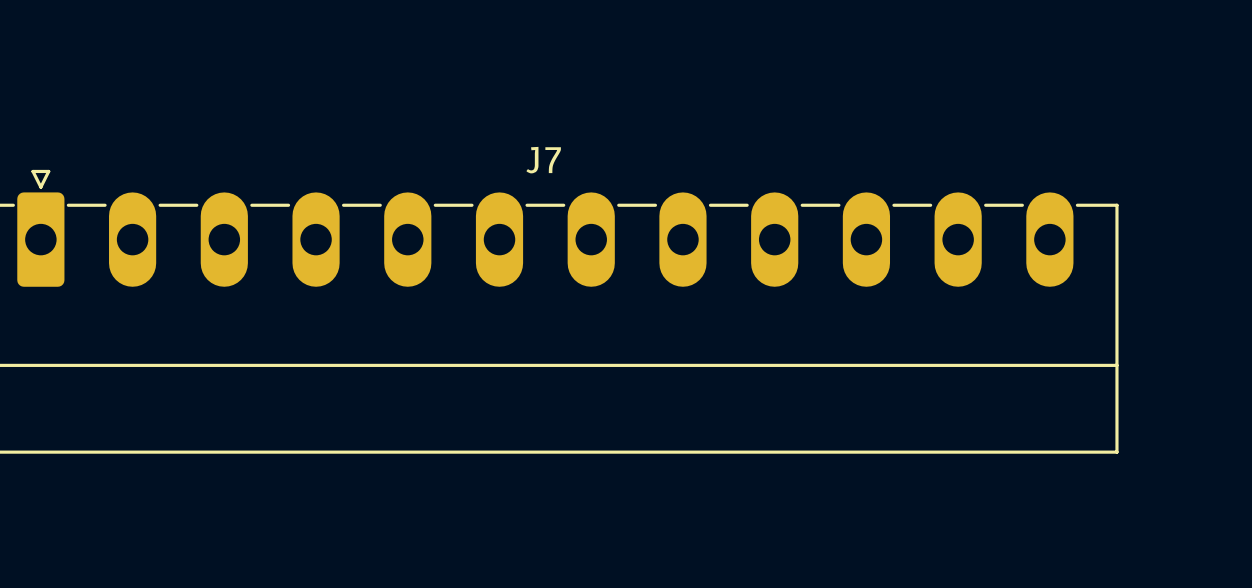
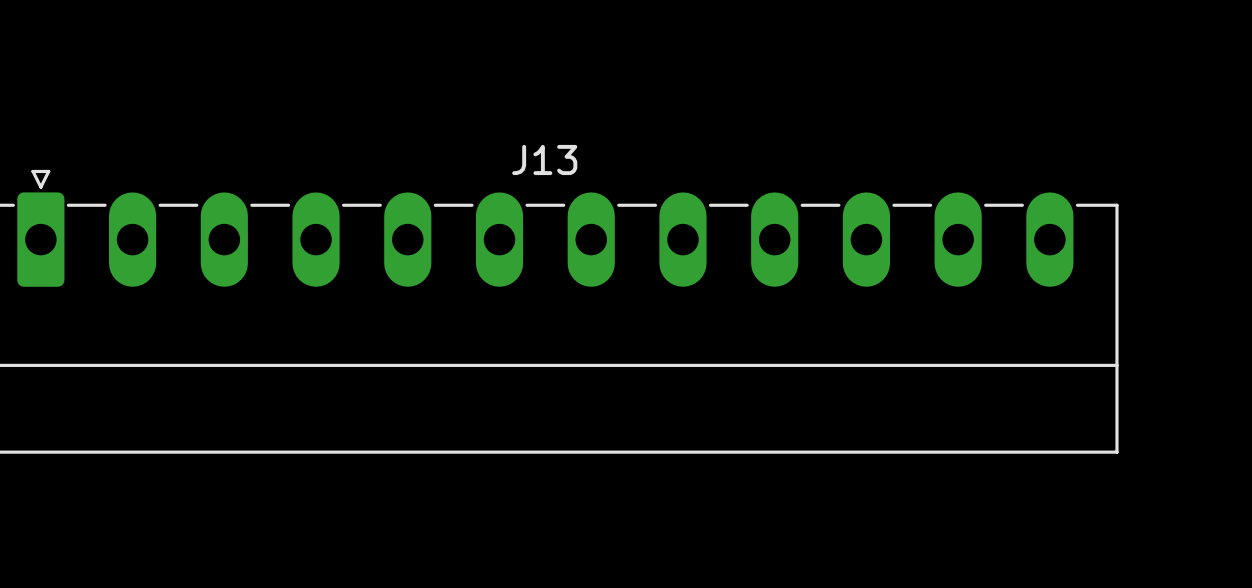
J7 name: J7 (543, 160) -> J13 (544, 159)

